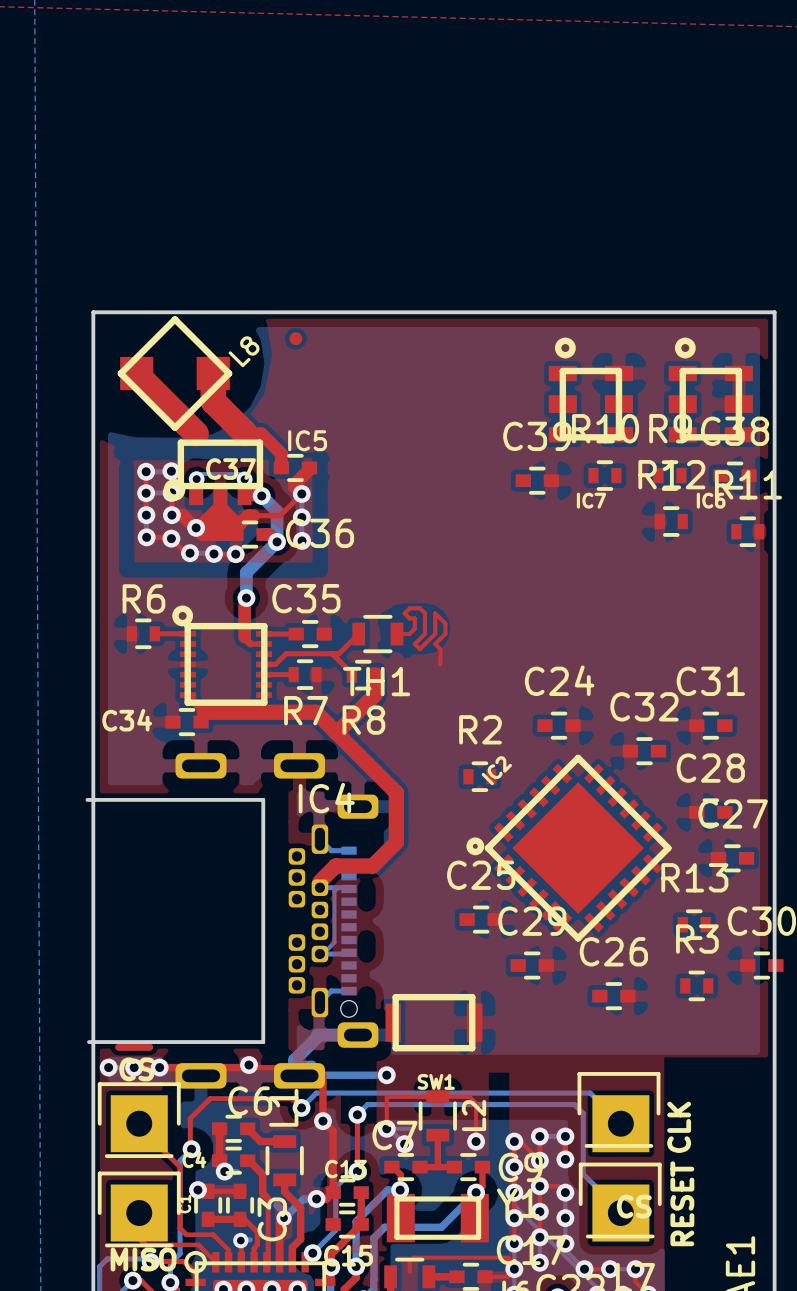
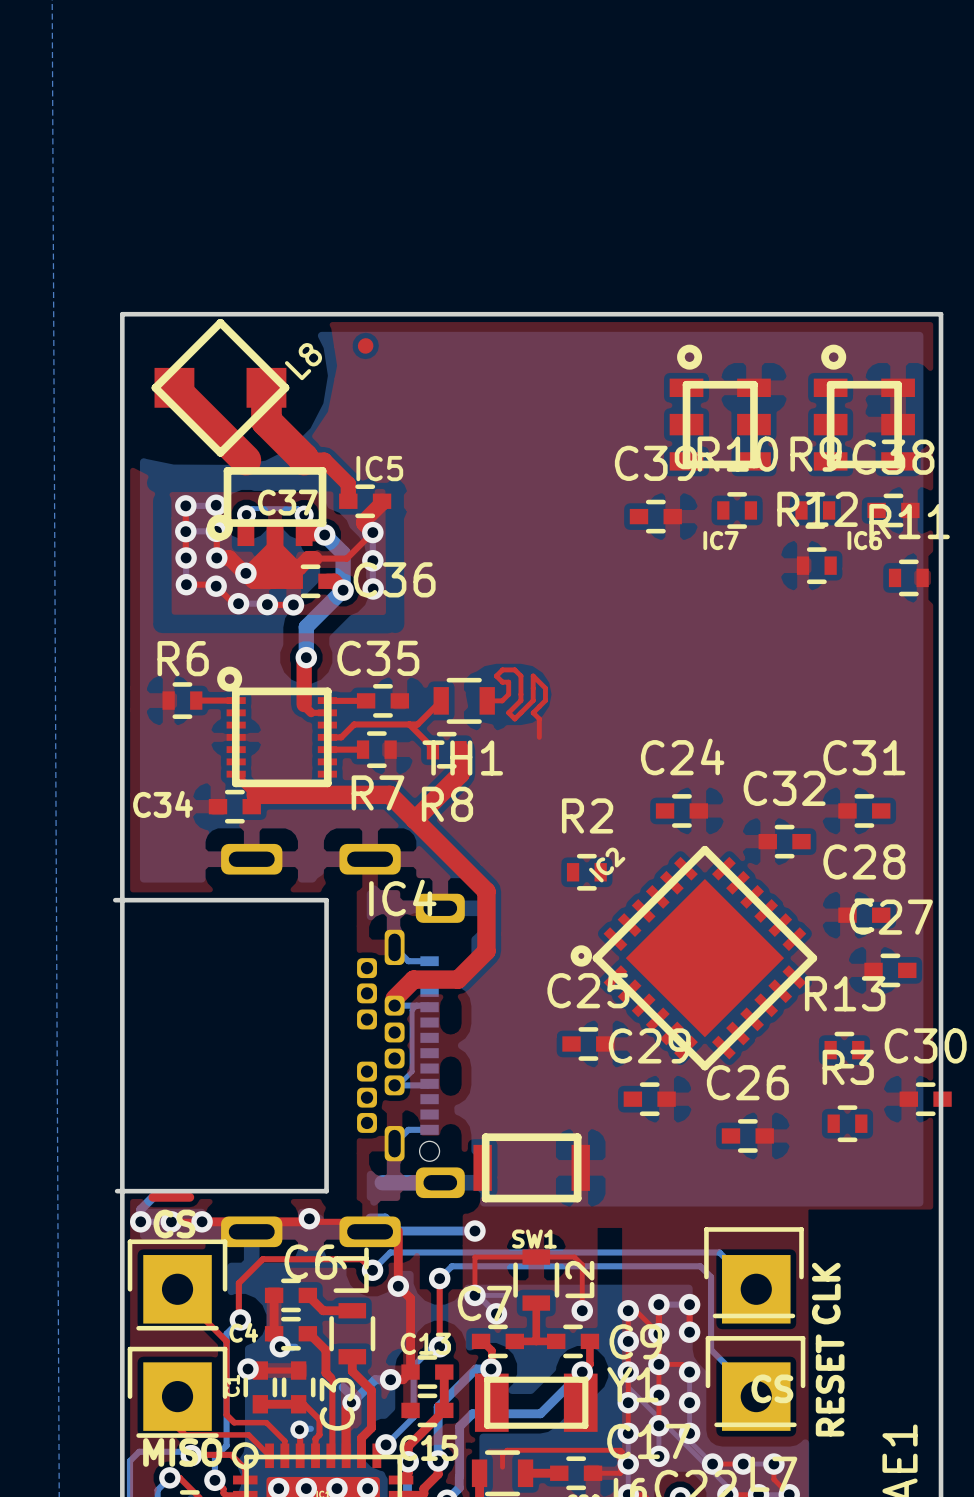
bottom track: (317, 1035) (294, 1059) (294, 1071) (299, 1075) -> (391, 1182) (382, 1182)
bottom track: none -> (153, 1197) (140, 1209) (140, 1221)

